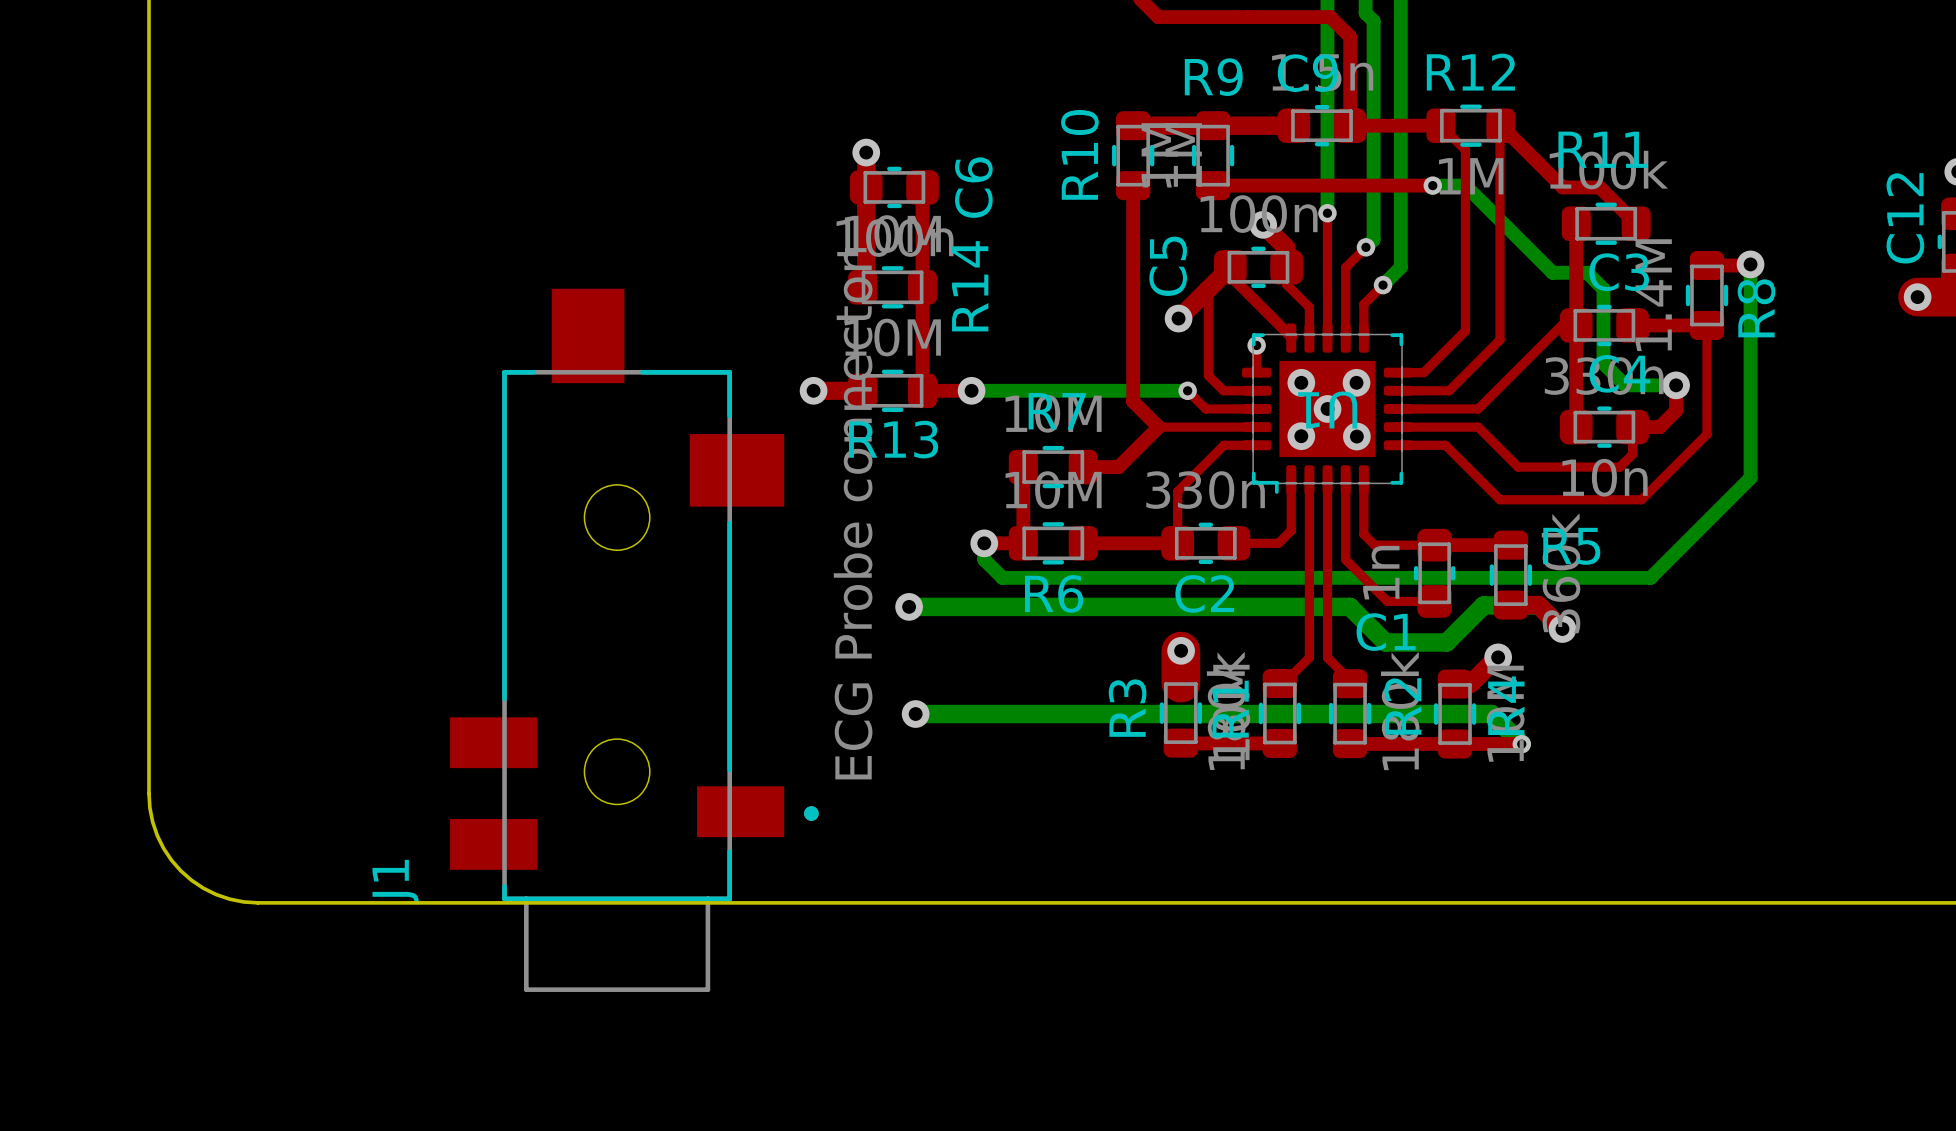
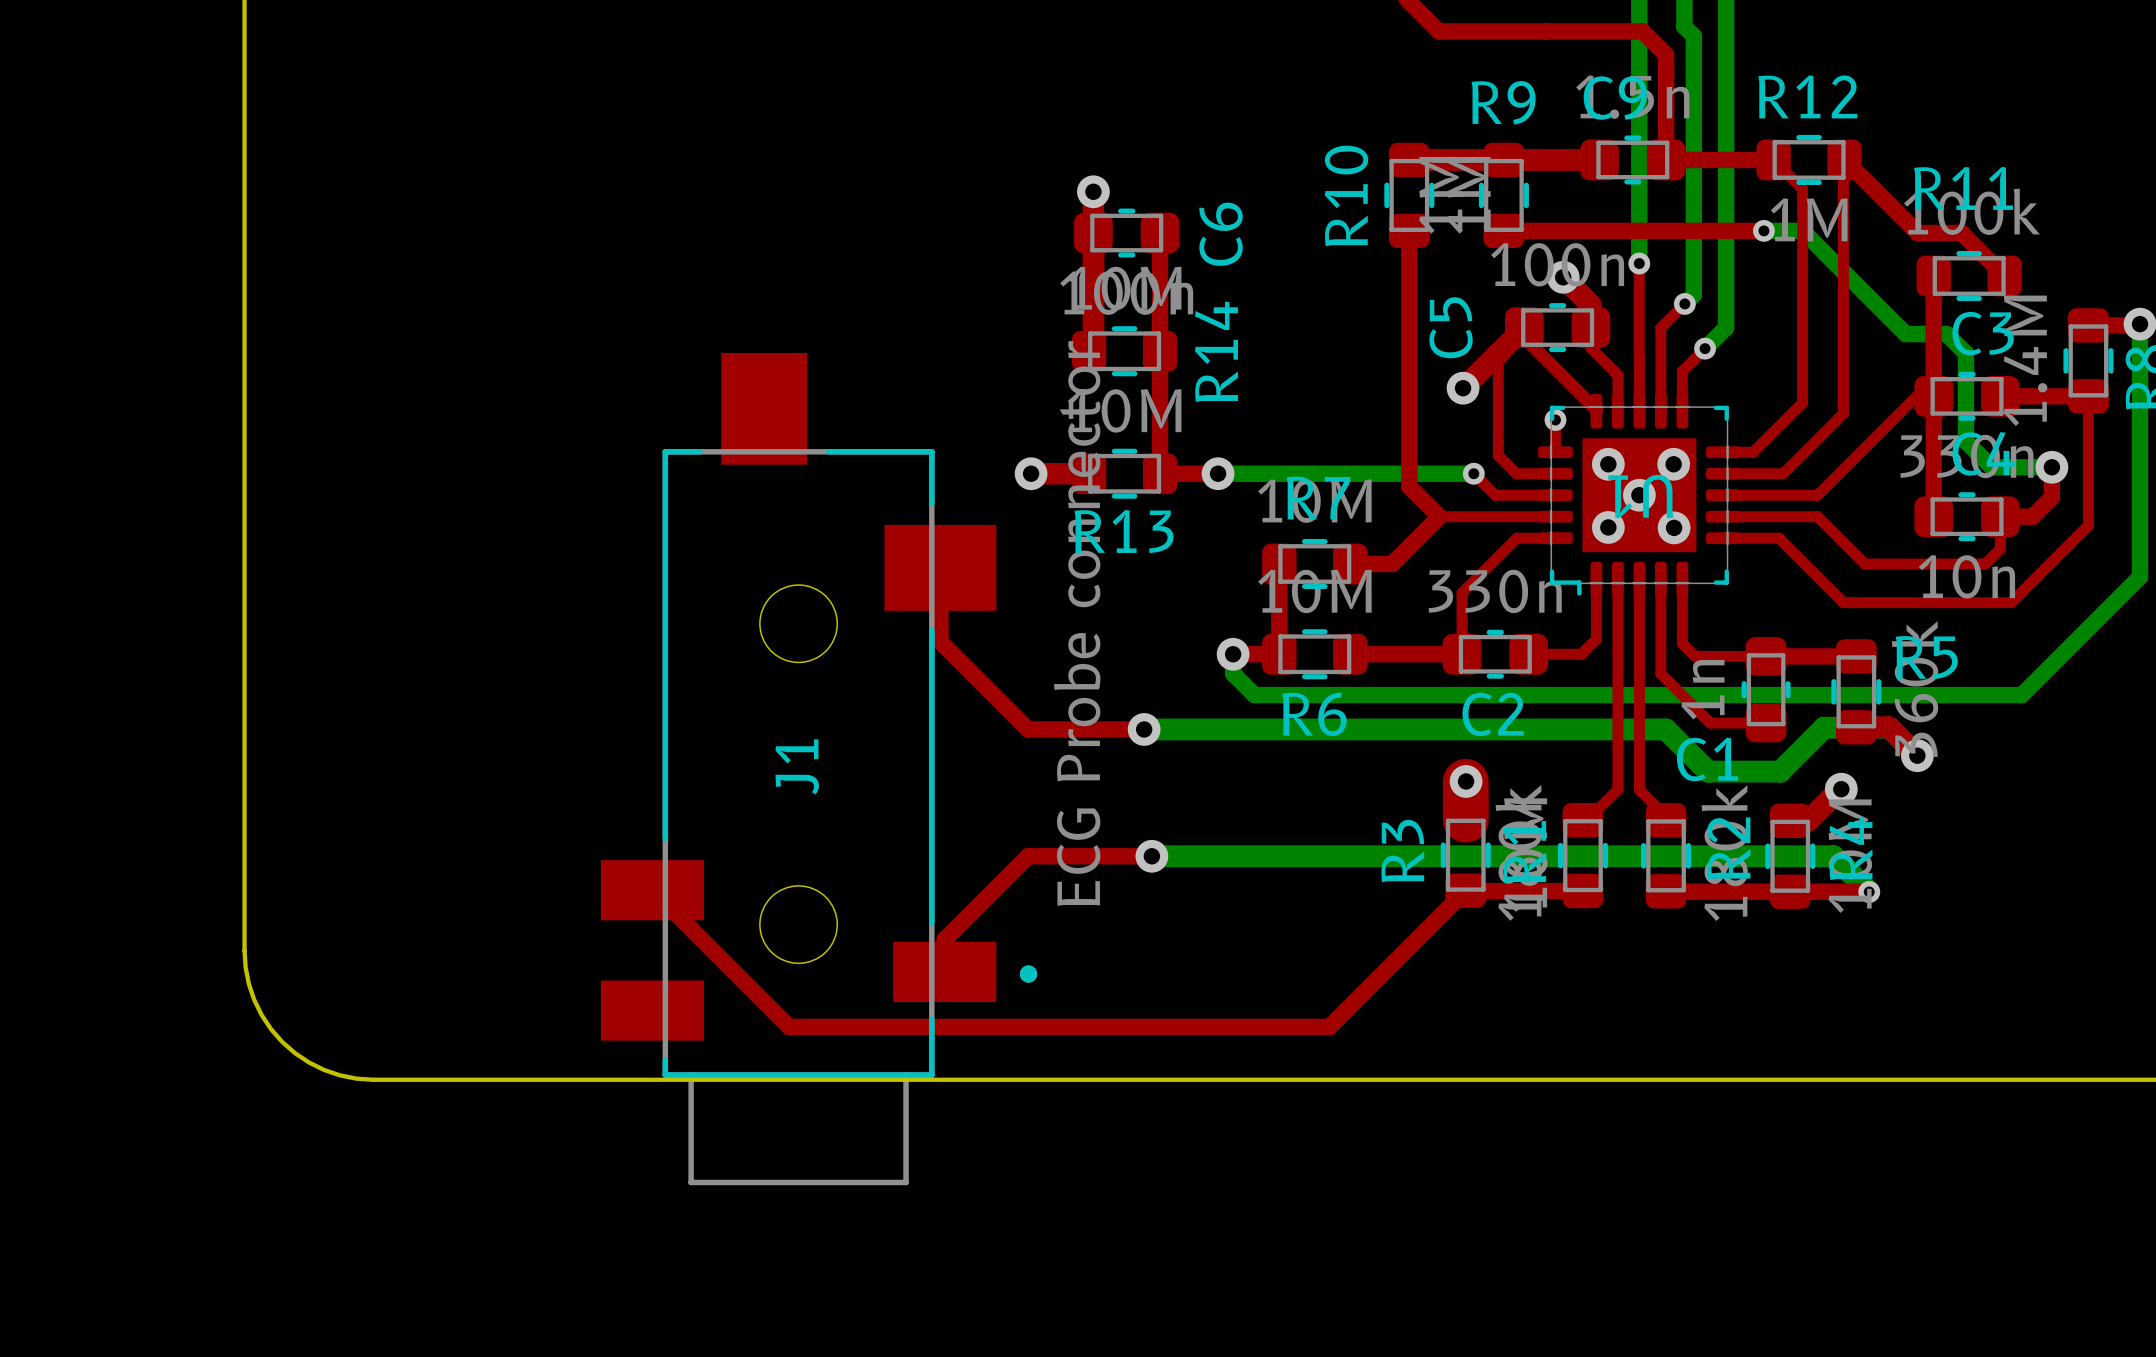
top track: none -> (940, 567) (940, 641) (1028, 729) (1144, 729)
top track: none -> (1151, 856) (1028, 856) (944, 939) (944, 971)
top track: none -> (652, 890) (789, 1026) (1329, 1026) (1465, 890)
J1 name position: J1 (395, 882) -> J1 (797, 766)

